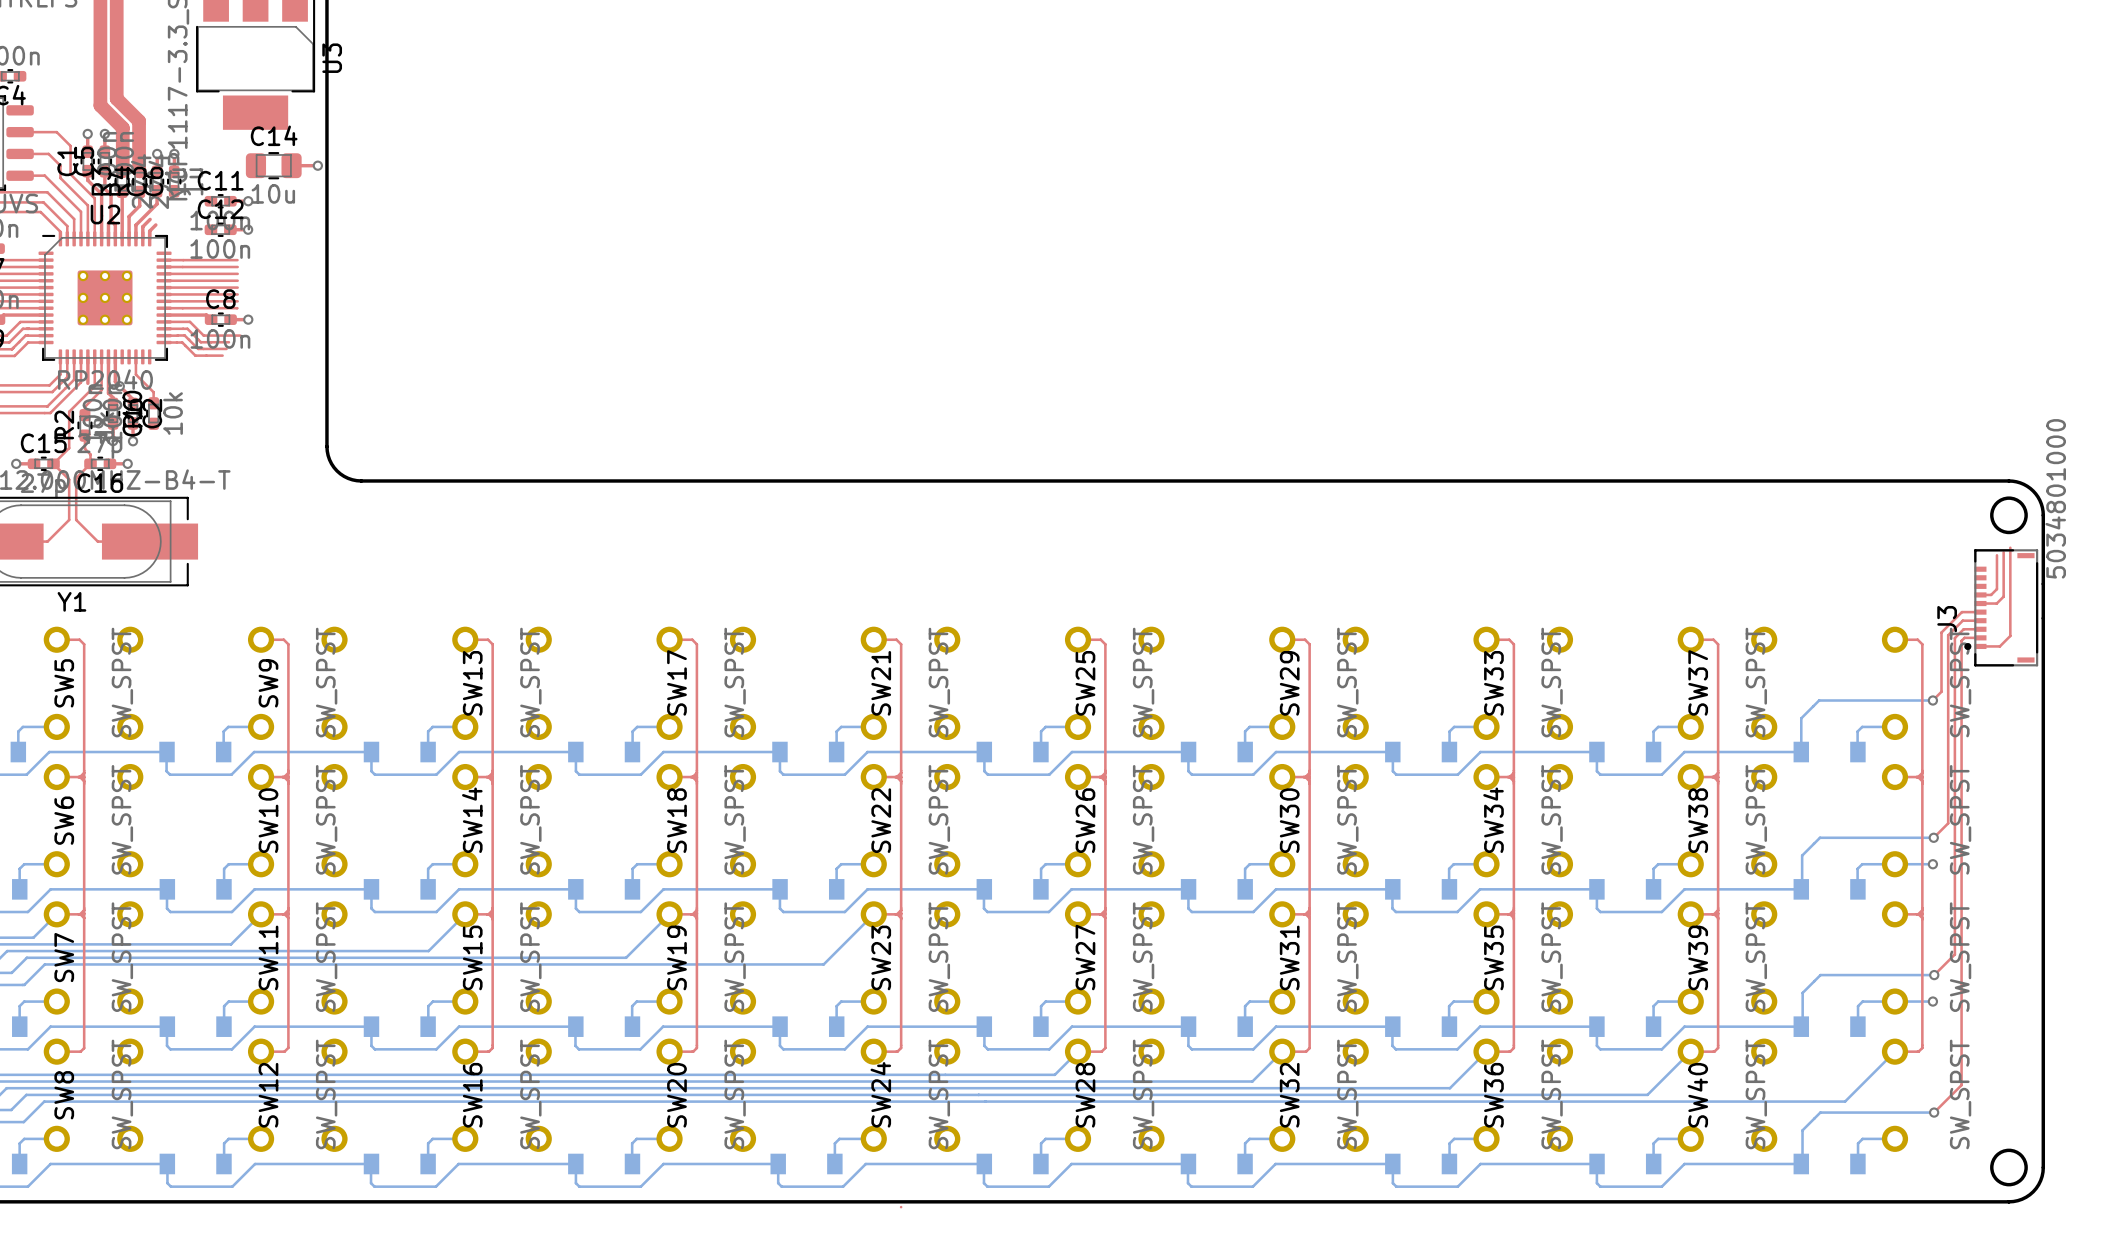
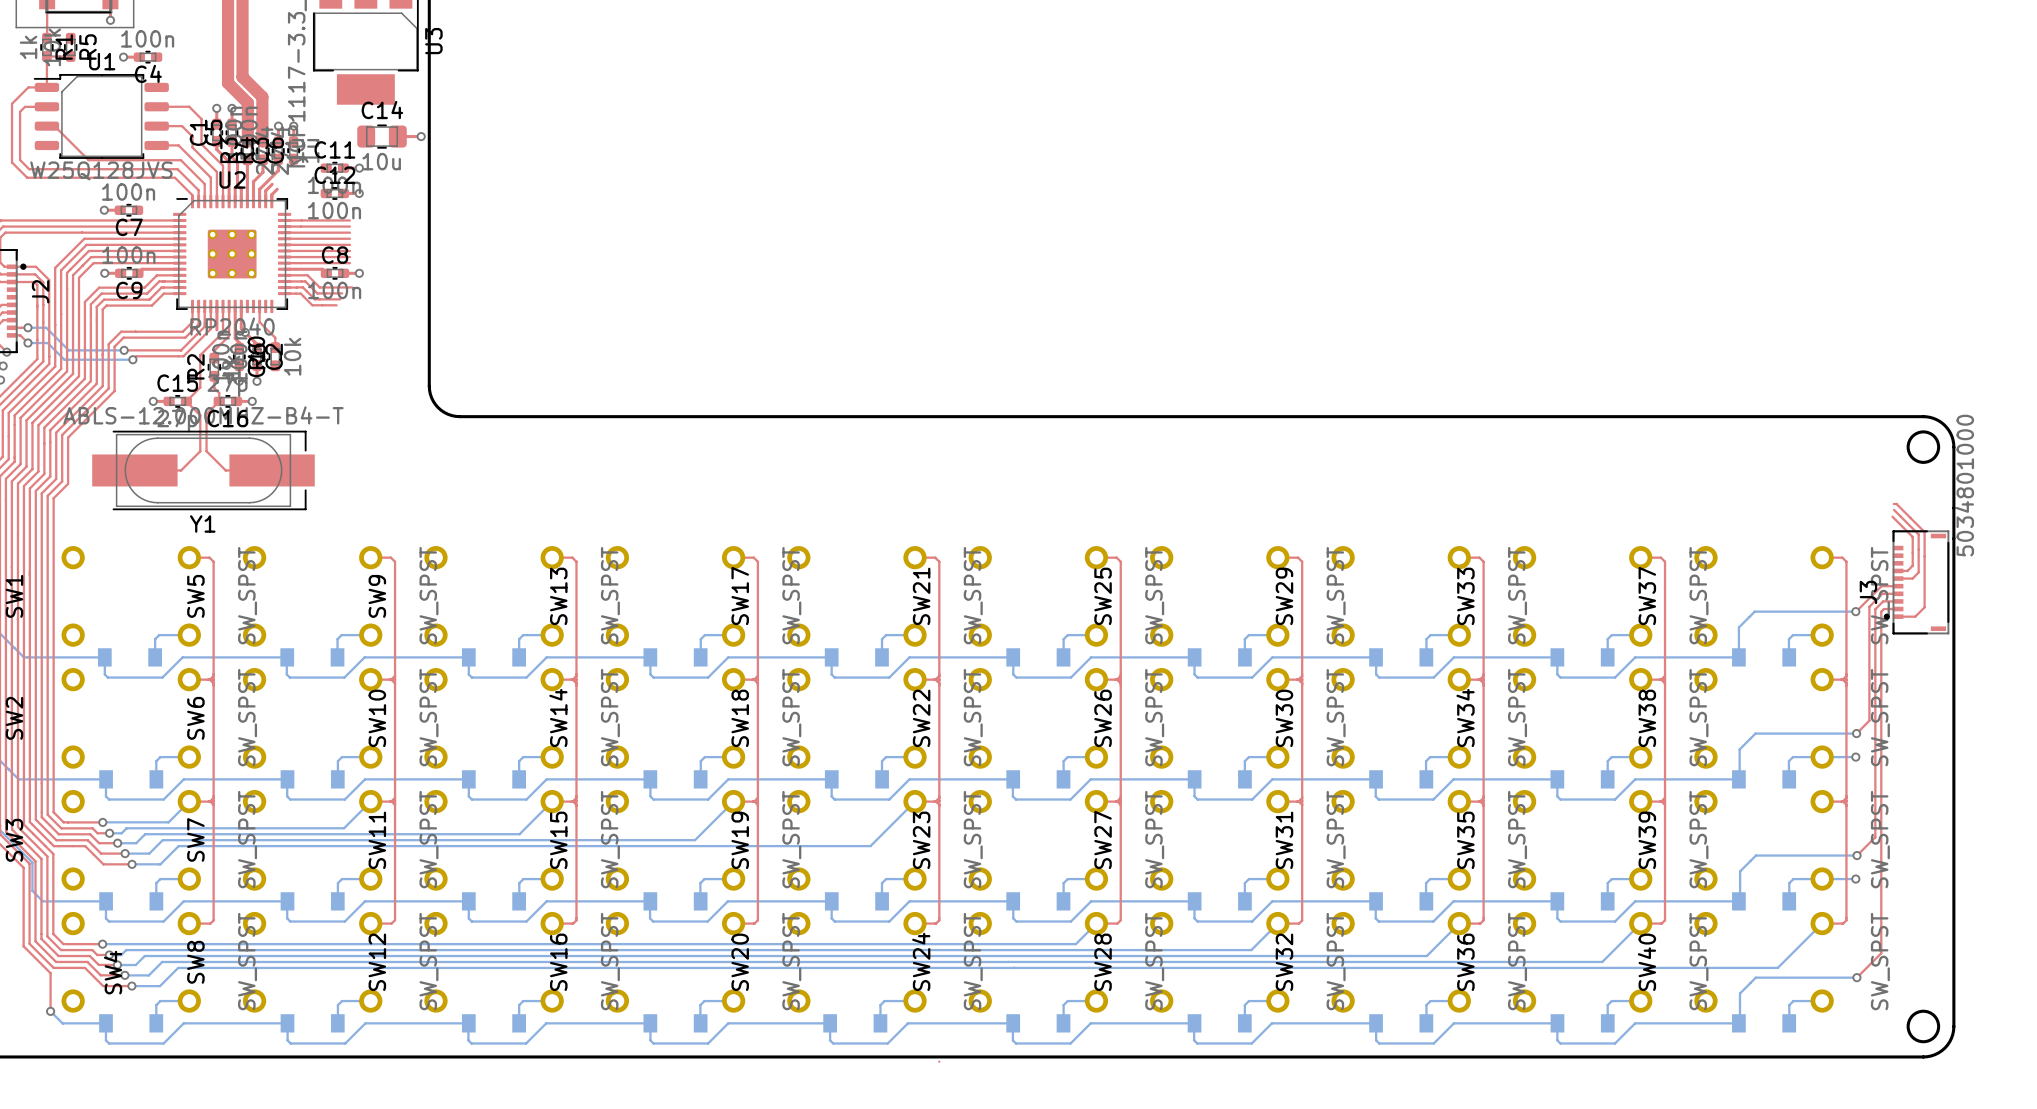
top track: (2010, 547) (2010, 610) -> (1893, 504) (1896, 504) (1924, 532)
top track: (2003, 552) (2003, 596) (1996, 603) (1980, 603) -> none
top track: (1996, 555) (1996, 589) (1991, 594) (1980, 594) -> none
top track: none -> (1894, 509) (1918, 534) (1918, 572) (1912, 578) (1898, 578)
top track: none -> (1892, 516) (1912, 536) (1912, 565) (1907, 570) (1898, 570)
J3 position: (2001, 607) -> (1916, 582)
top track: (1980, 612) (1961, 612) (1941, 632) (1941, 691) (1932, 700) -> (1898, 586) (1881, 586) (1855, 611)
top track: (1980, 620) (1962, 620) (1948, 635) (1948, 695) -> (1898, 593) (1882, 593) (1869, 606)
top track: (1980, 629) (1963, 629) (1954, 638) (1954, 697) -> (1898, 601) (1883, 601) (1875, 609)
top track: (2010, 635) (1999, 646) (1980, 646) -> (1924, 554) (1924, 607) (1915, 616) (1898, 616)
top track: (1980, 637) (1964, 637) (1961, 640) (1961, 700) -> (1898, 609) (1883, 609) (1881, 611)

